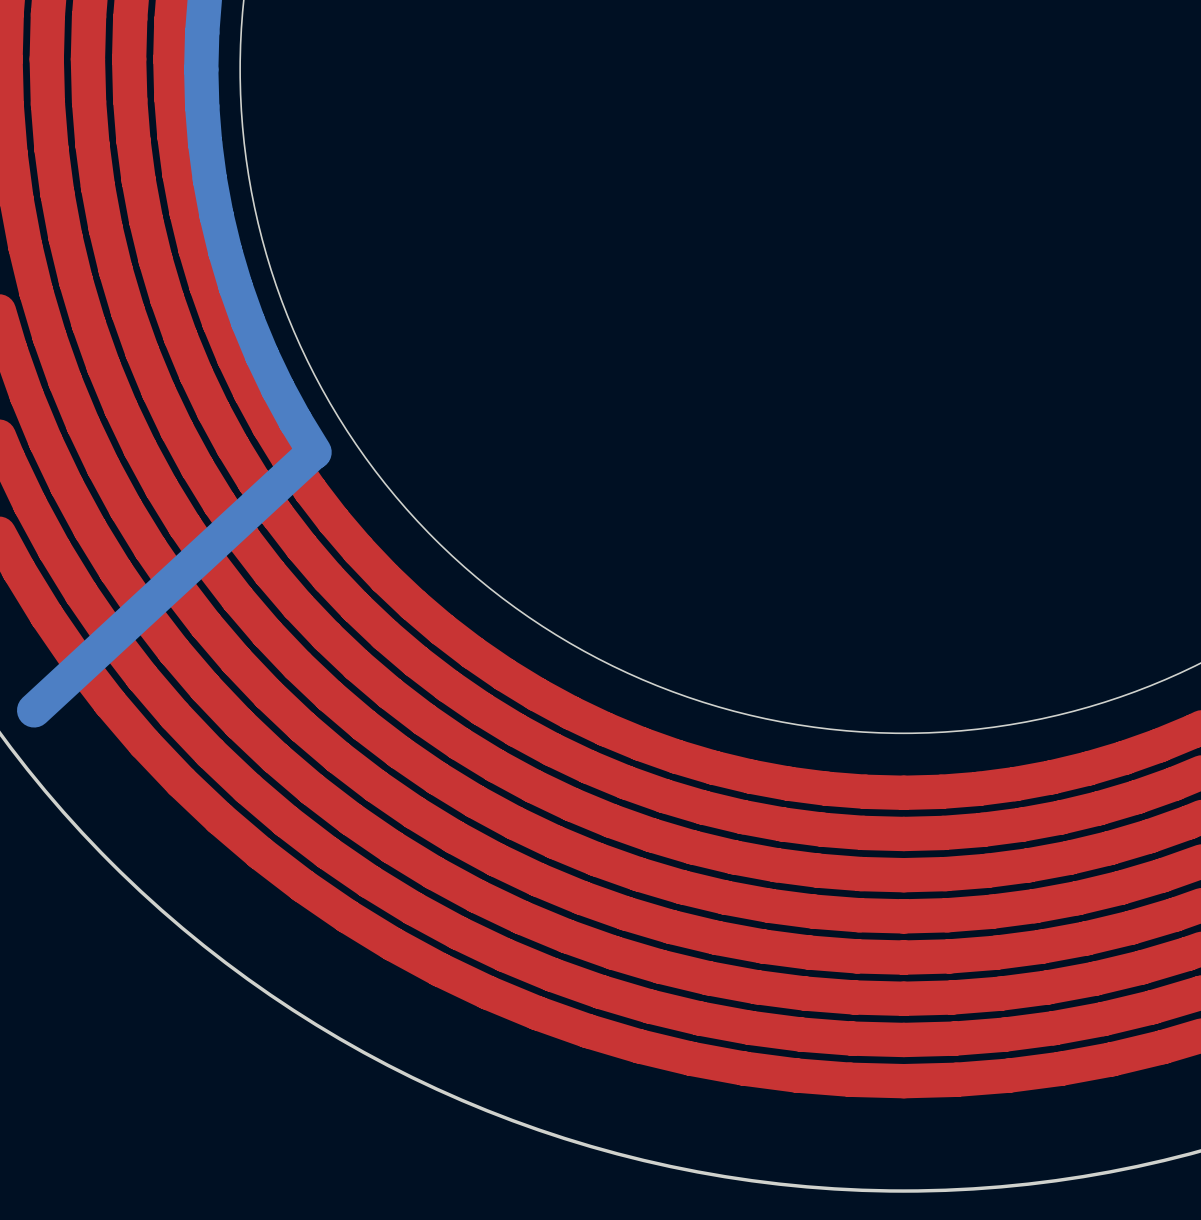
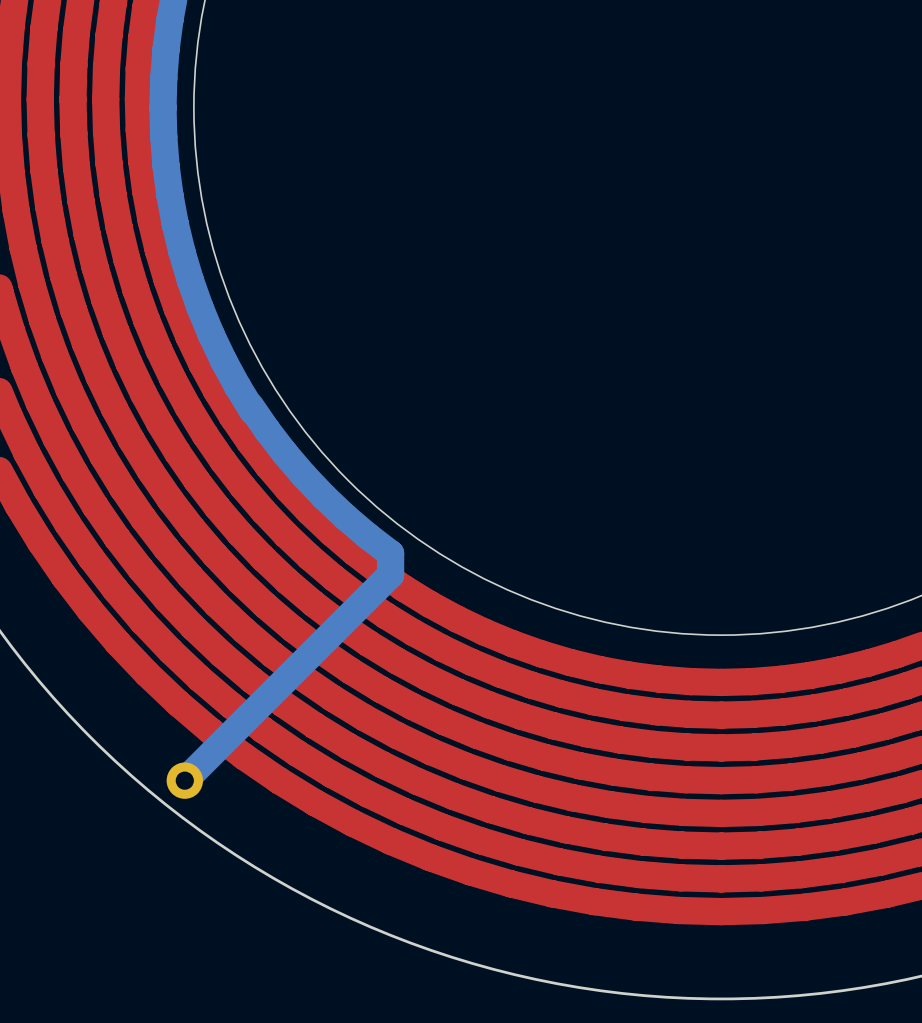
bottom track: none -> (250, 405) (267, 430) (303, 475) (345, 516) (390, 553) (390, 574) (184, 780)
bottom track: (313, 452) (34, 710) -> none
part: none -> (184, 780)

